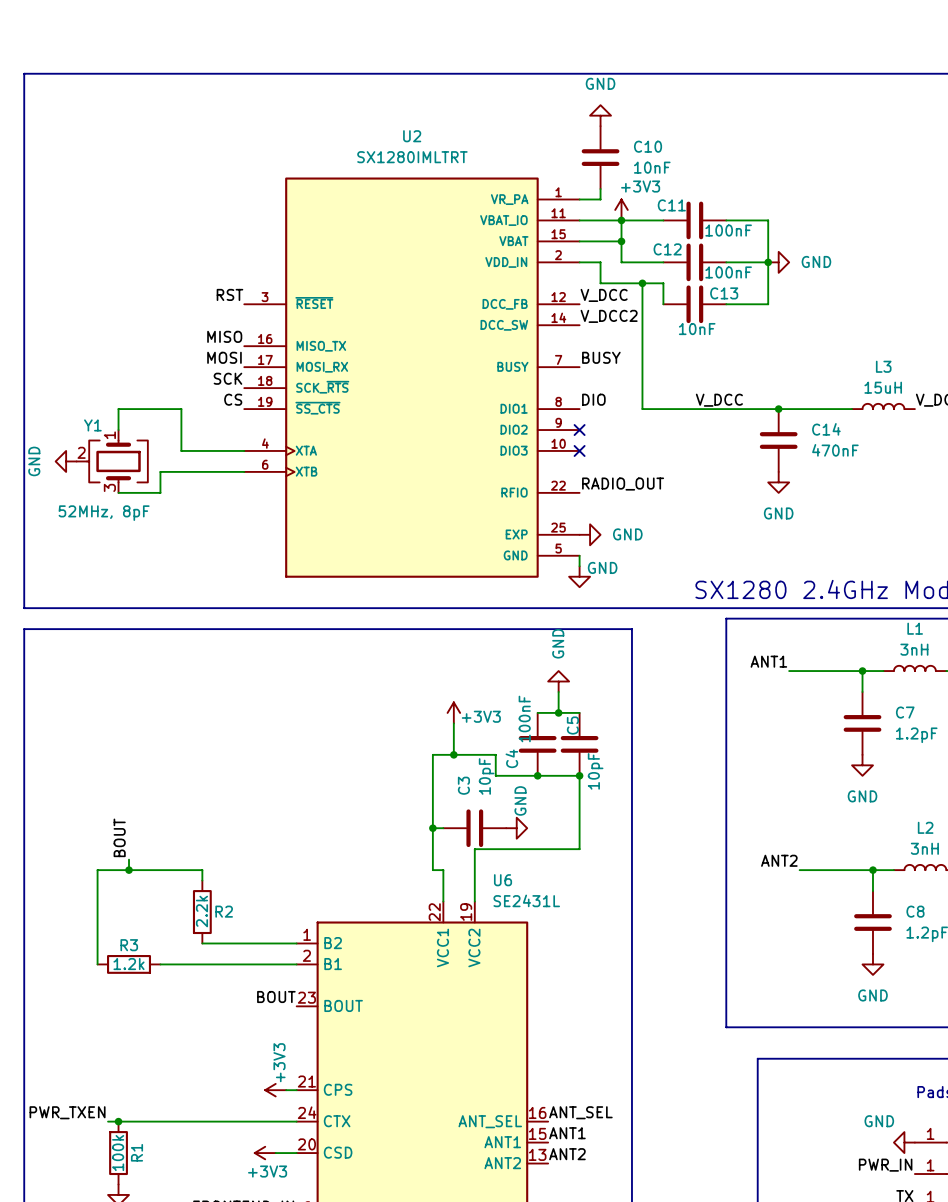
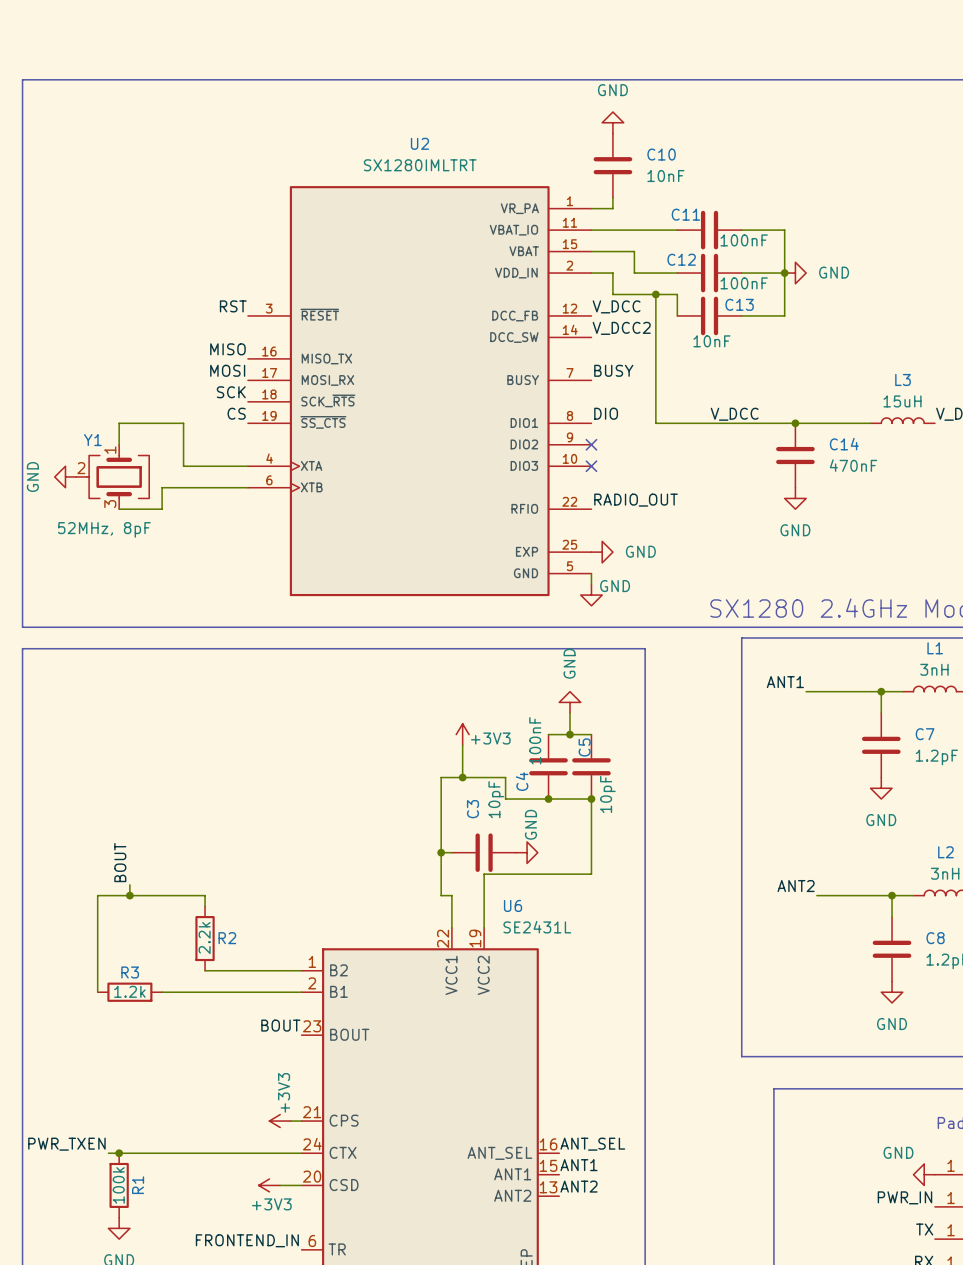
power symbol: +3V3 (621, 209) -> none
wire: (621, 220) (621, 241) -> none
junction: (621, 220) -> none
junction: (621, 241) -> none

